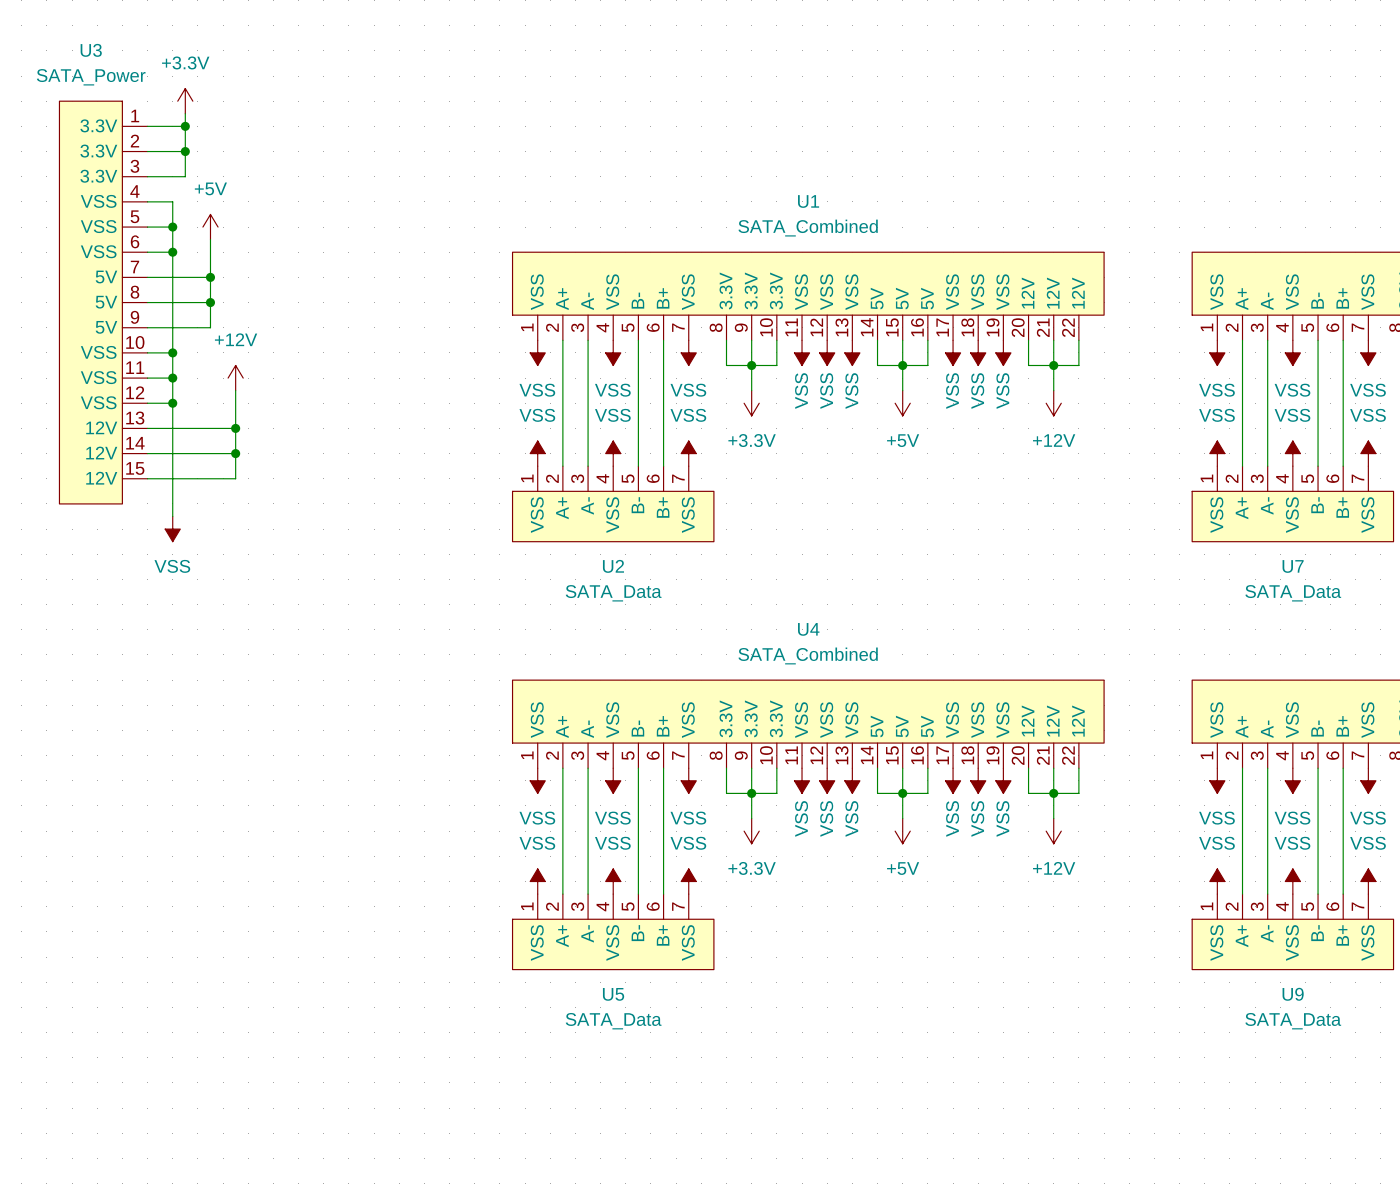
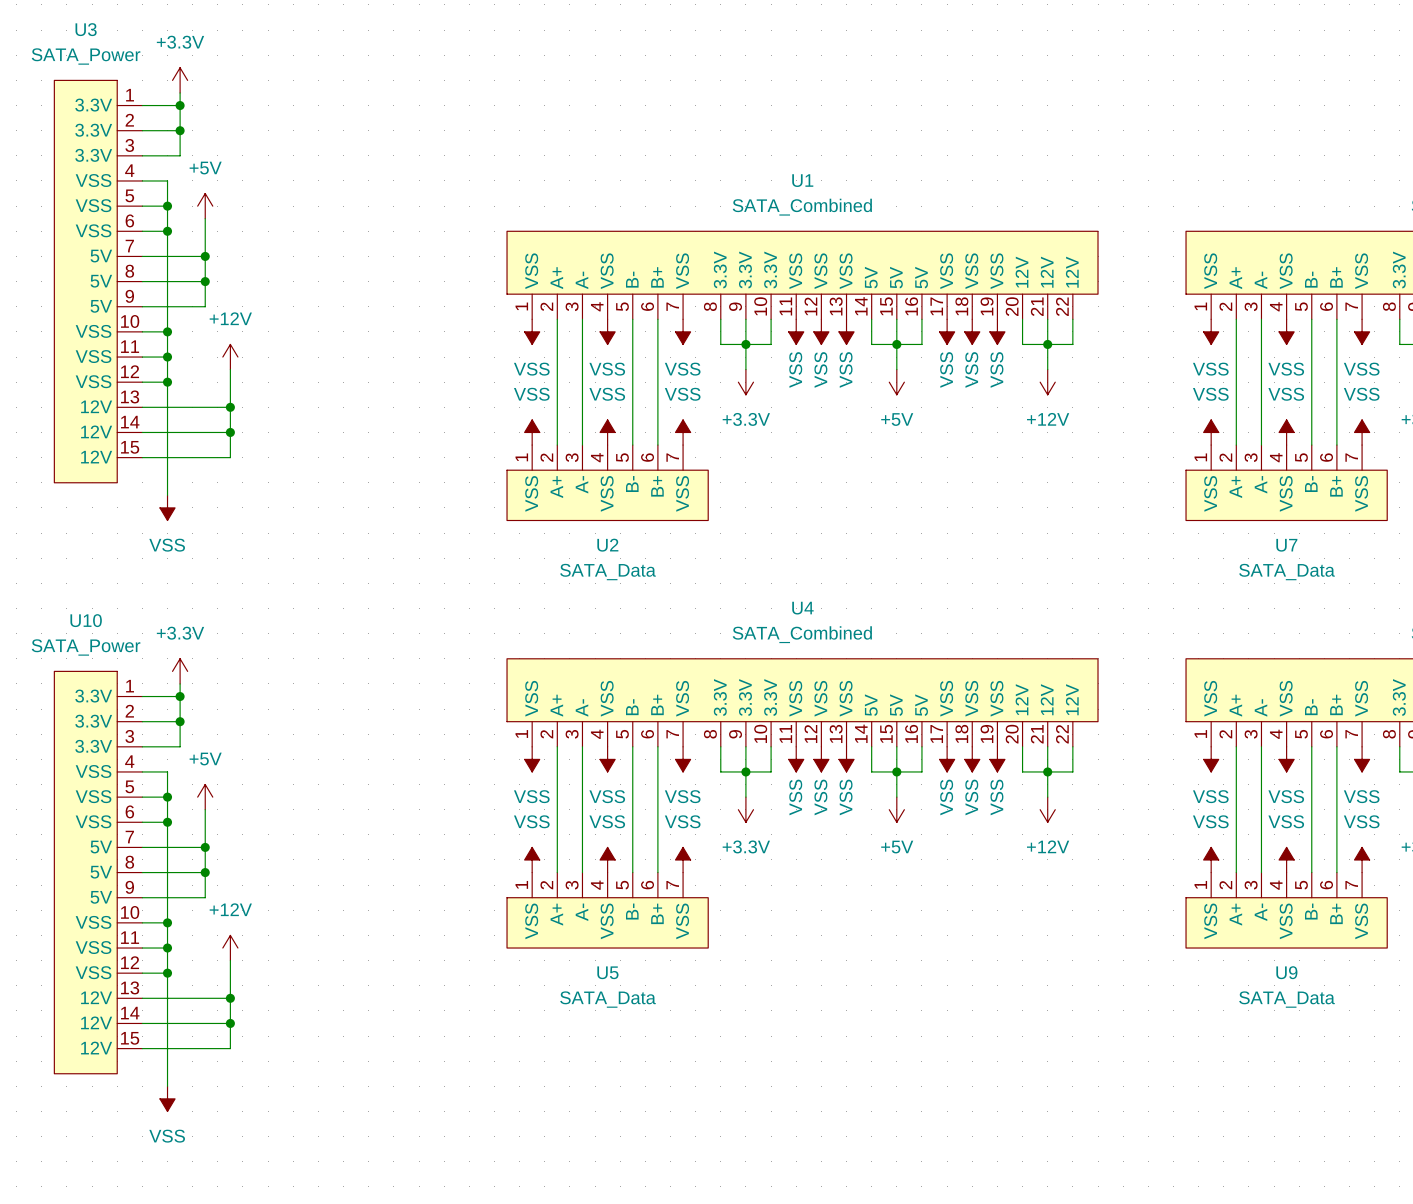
power symbol: none -> +3.3V (180, 671)
wire: none -> (180, 683) (180, 746) (142, 746)
wire: none -> (142, 696) (180, 696)
junction: none -> (180, 696)
wire: none -> (142, 721) (180, 721)
junction: none -> (180, 721)
wire: none -> (142, 771) (167, 771) (167, 1086)
wire: none -> (142, 797) (167, 797)
junction: none -> (167, 797)
power symbol: none -> +5V (205, 797)
wire: none -> (205, 809) (205, 897) (142, 897)
wire: none -> (142, 822) (167, 822)
junction: none -> (167, 822)
wire: none -> (142, 847) (205, 847)
junction: none -> (205, 847)
U10: none -> SATA_Power (98, 872)
wire: none -> (142, 872) (205, 872)
junction: none -> (205, 872)
wire: none -> (142, 922) (167, 922)
junction: none -> (167, 922)
wire: none -> (142, 948) (167, 948)
junction: none -> (167, 948)
power symbol: none -> +12V (230, 948)
wire: none -> (230, 960) (230, 1048) (142, 1048)
wire: none -> (142, 973) (167, 973)
junction: none -> (167, 973)
wire: none -> (142, 998) (230, 998)
junction: none -> (230, 998)
wire: none -> (142, 1023) (230, 1023)
junction: none -> (230, 1023)
power symbol: none -> VSS (167, 1098)

